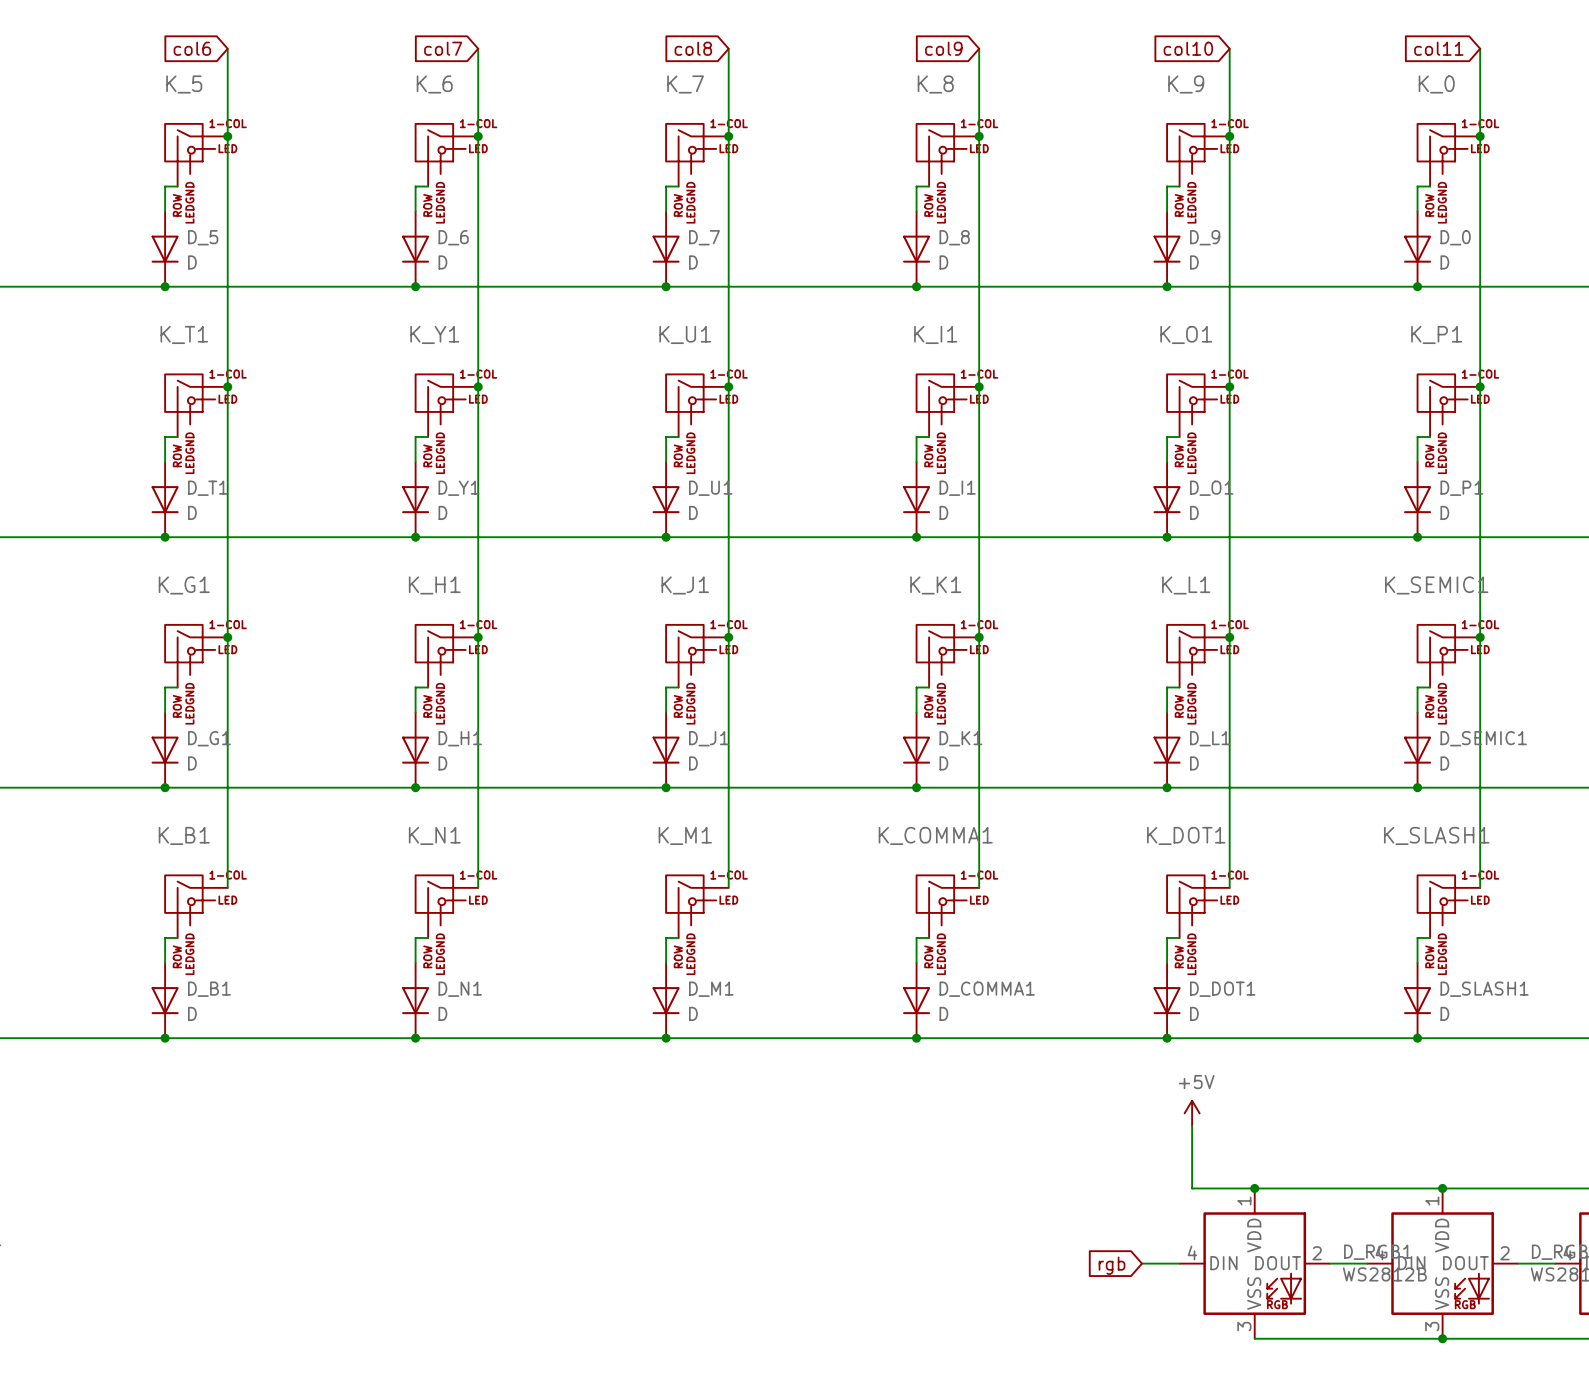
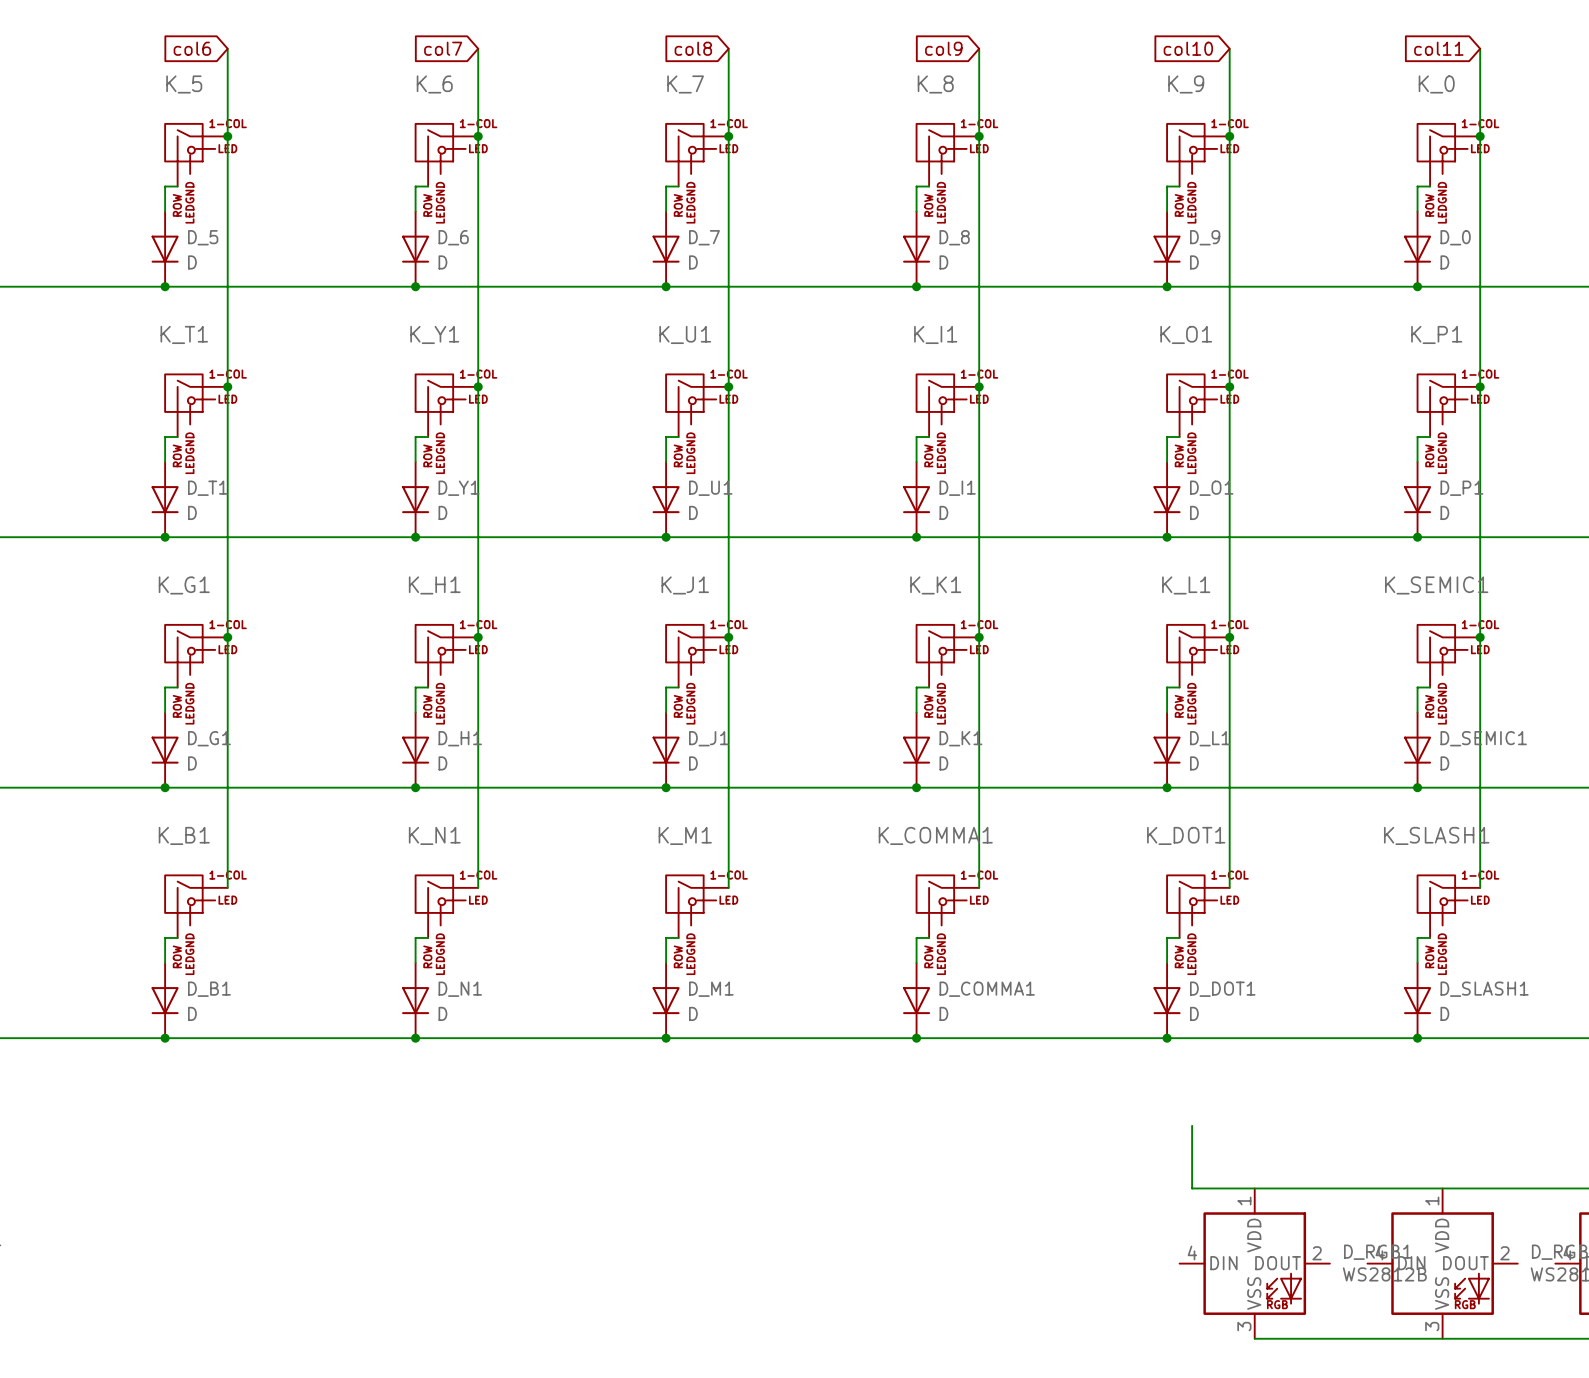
power symbol: +5V (1192, 1113) -> none
junction: (1254, 1188) -> none
junction: (1442, 1188) -> none
wire: (1142, 1263) (1179, 1263) -> none
wire: (1329, 1263) (1367, 1263) -> none
wire: (1517, 1263) (1555, 1263) -> none
global label: rgb (1112, 1265) -> none
junction: (1442, 1338) -> none

